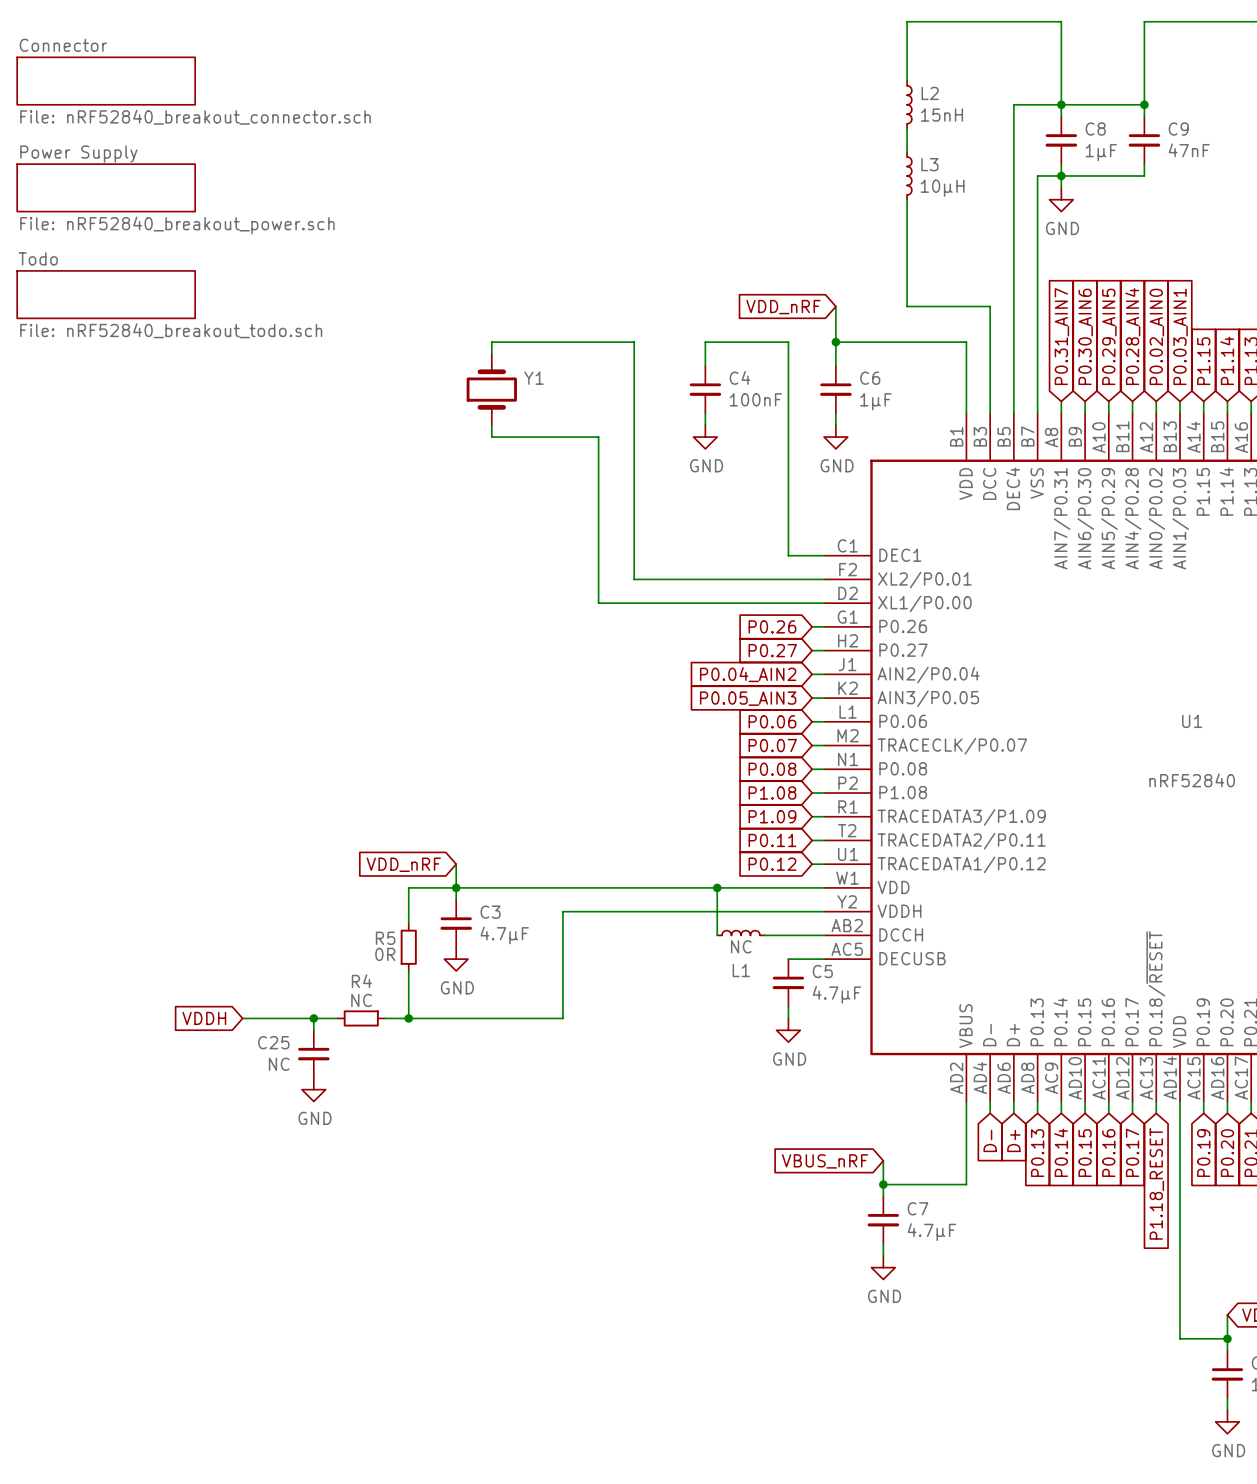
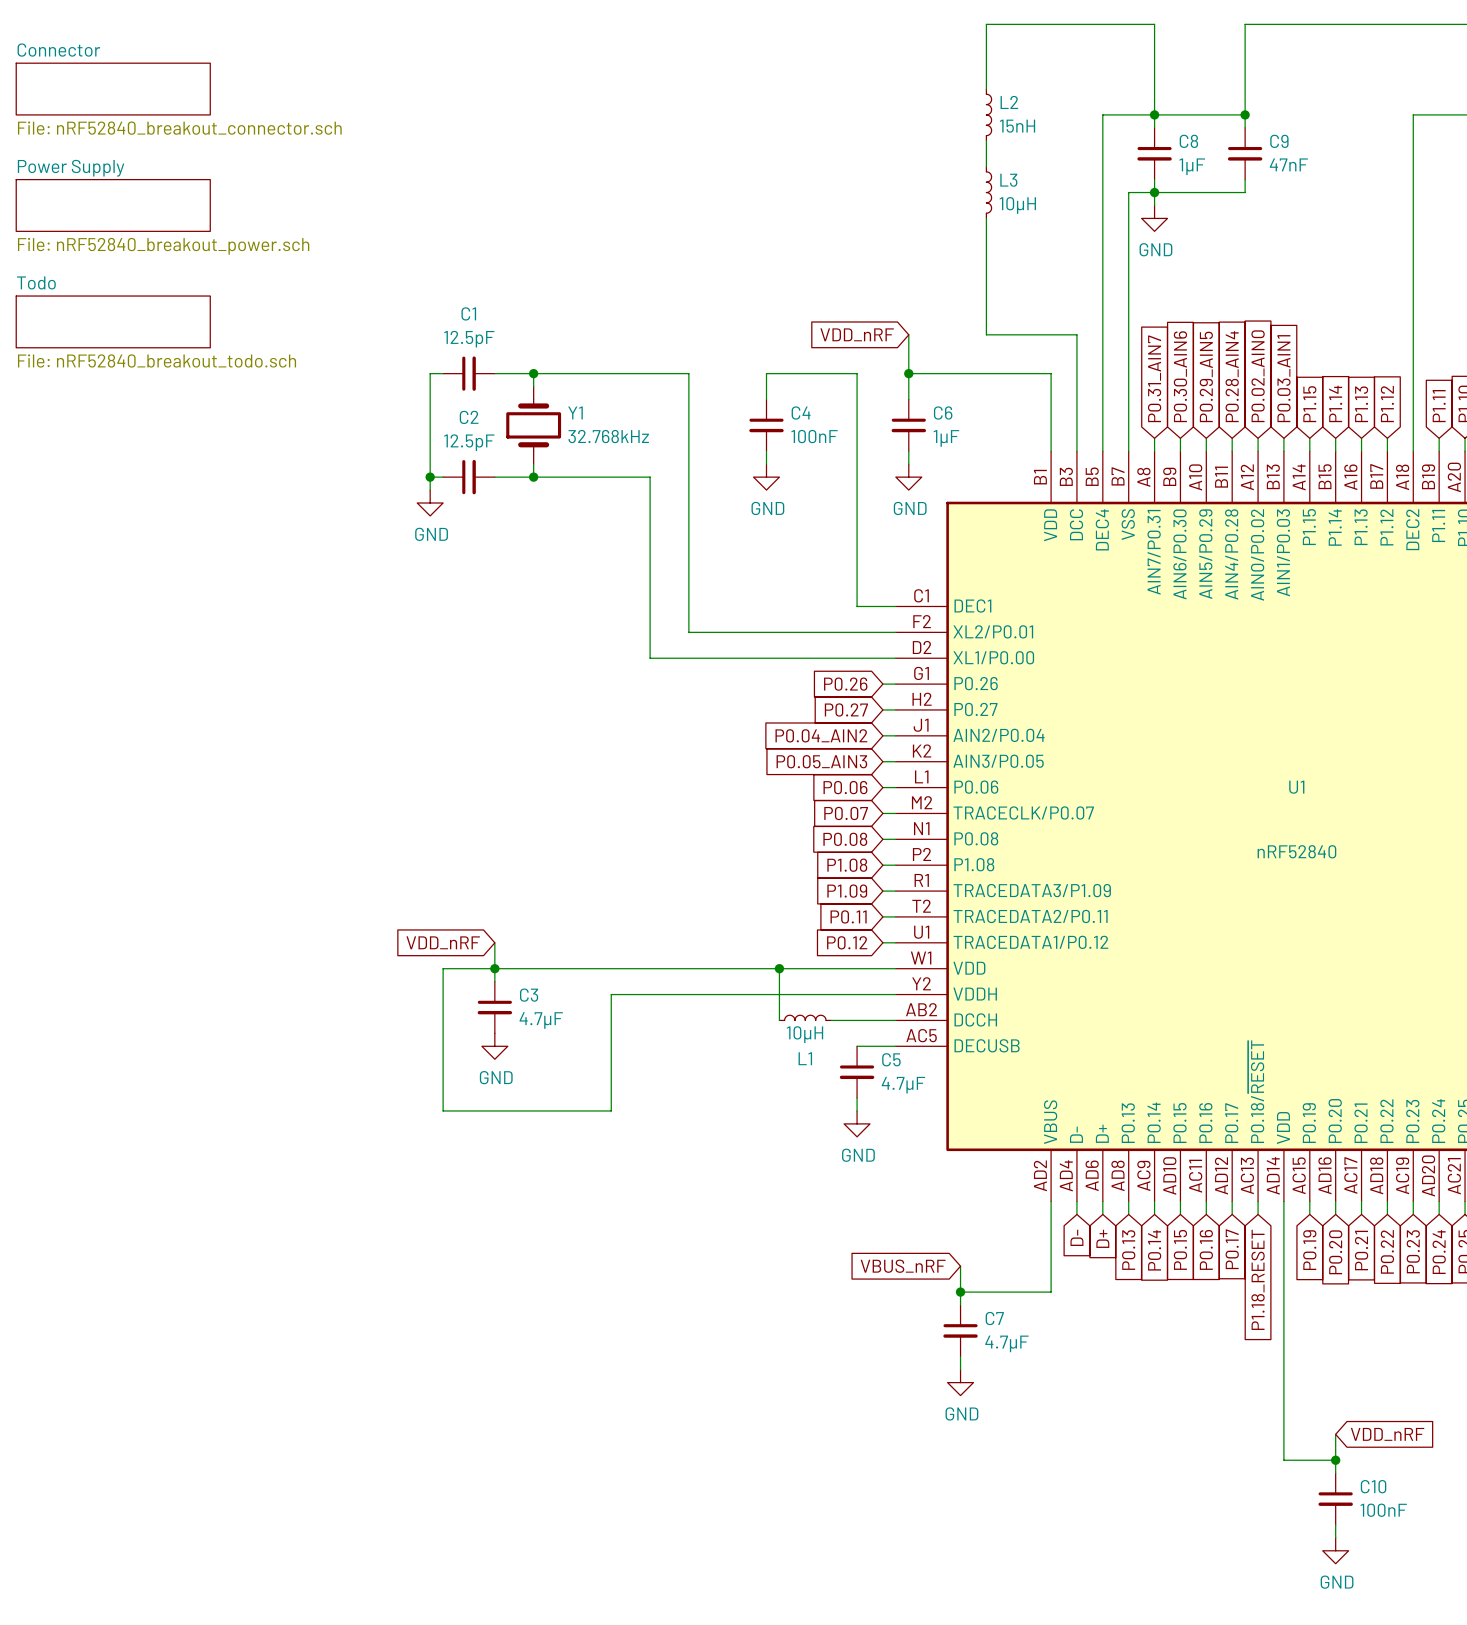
wire: none -> (443, 373) (430, 373) (430, 490)
C1: none -> 12.5pF (468, 373)
wire: none -> (494, 373) (533, 373)
junction: none -> (533, 373)
Y1 value: none -> 32.768kHz (608, 436)
wire: none -> (430, 477) (443, 477)
junction: none -> (430, 477)
C2: none -> 12.5pF (468, 477)
wire: none -> (494, 477) (533, 477)
junction: none -> (533, 477)
power symbol: none -> GND (430, 503)
wire: none -> (443, 1007) (443, 1059)
L1 value: NC (741, 946) -> 10µH (805, 1034)
R5: 0R (408, 947) -> none
global label: VDDH (204, 1018) -> none
wire: (242, 1018) (337, 1018) -> none
wire: (313, 1018) (313, 1030) -> none
junction: (313, 1018) -> none
R4: NC (361, 1018) -> none
wire: (385, 1018) (408, 1018) -> none
junction: (408, 1018) -> none
C25: NC (313, 1054) -> none
power symbol: GND (313, 1089) -> none

